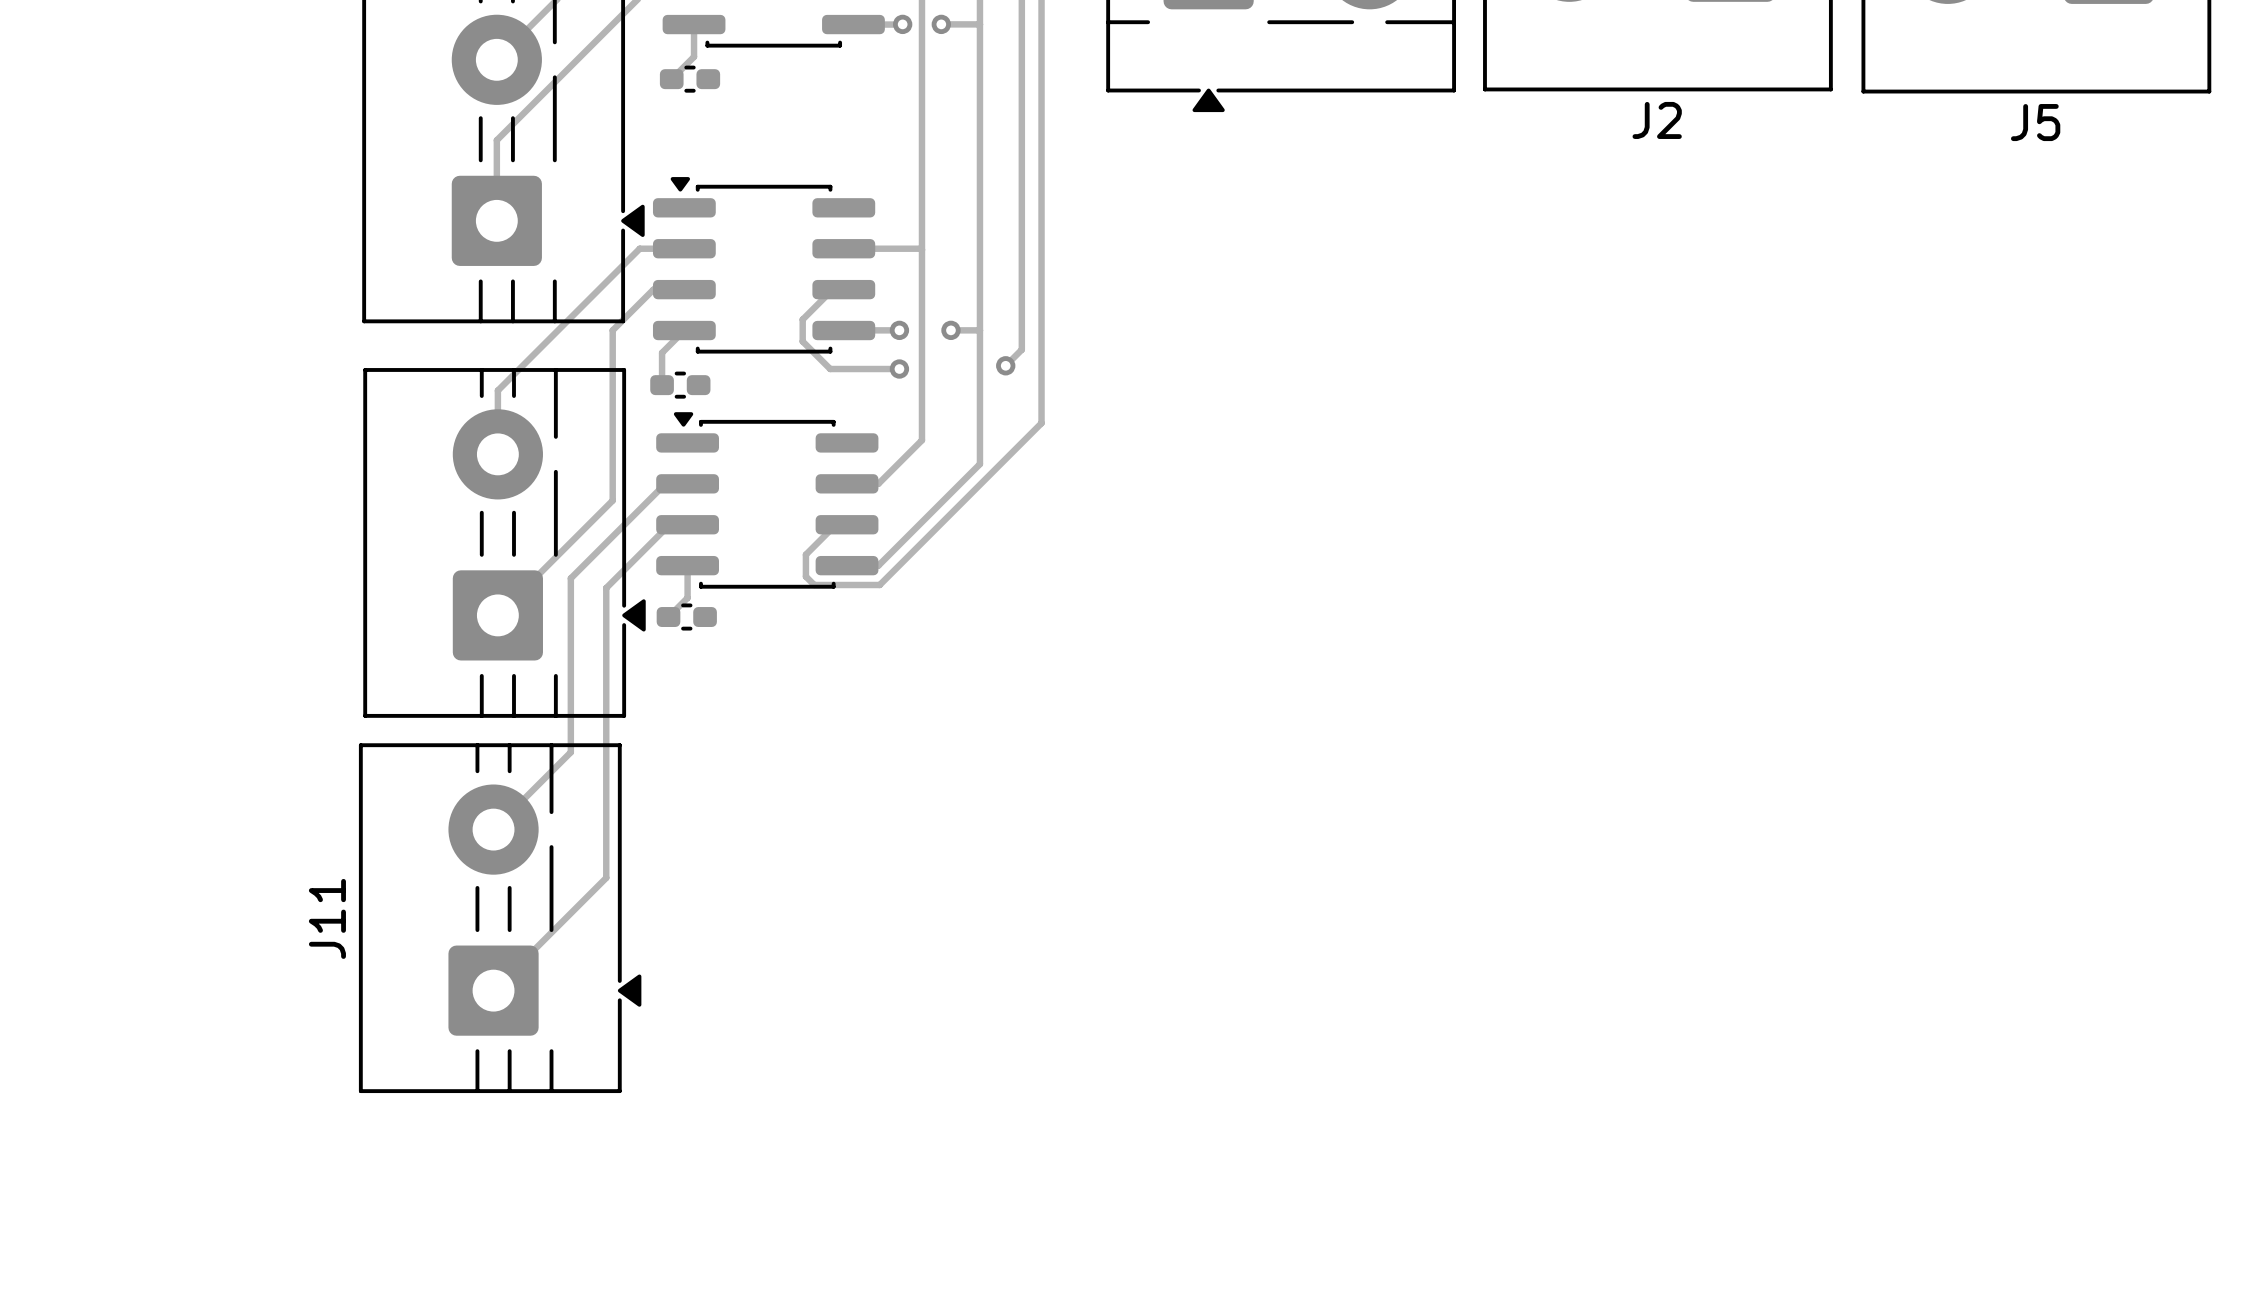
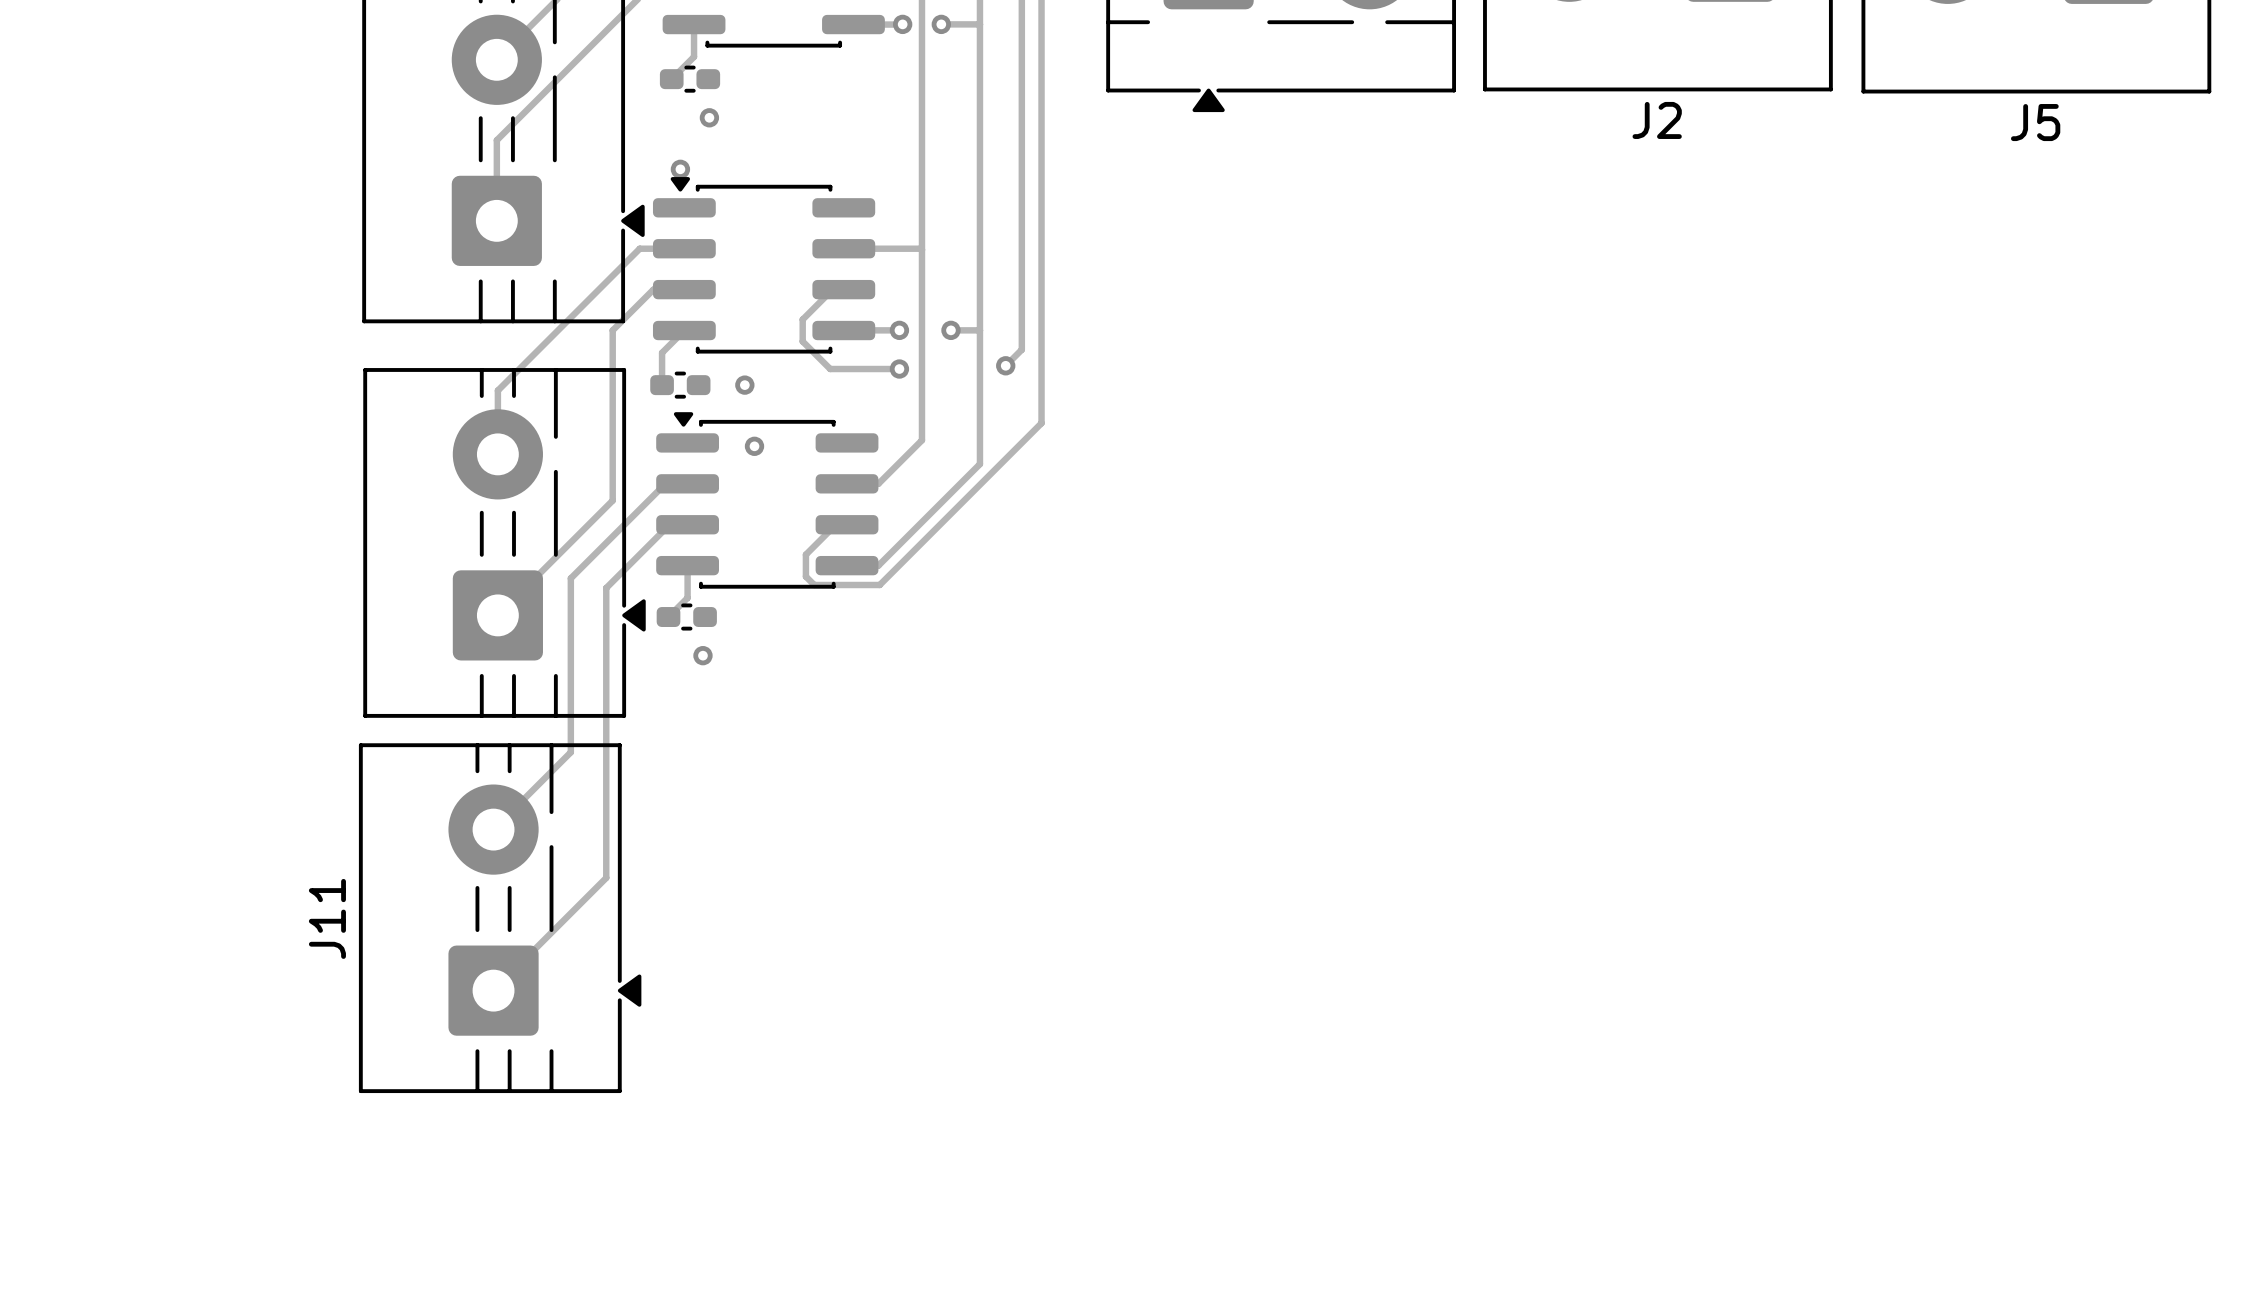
via: none -> (709, 117)
via: none -> (680, 169)
via: none -> (744, 385)
via: none -> (754, 446)
via: none -> (702, 655)

